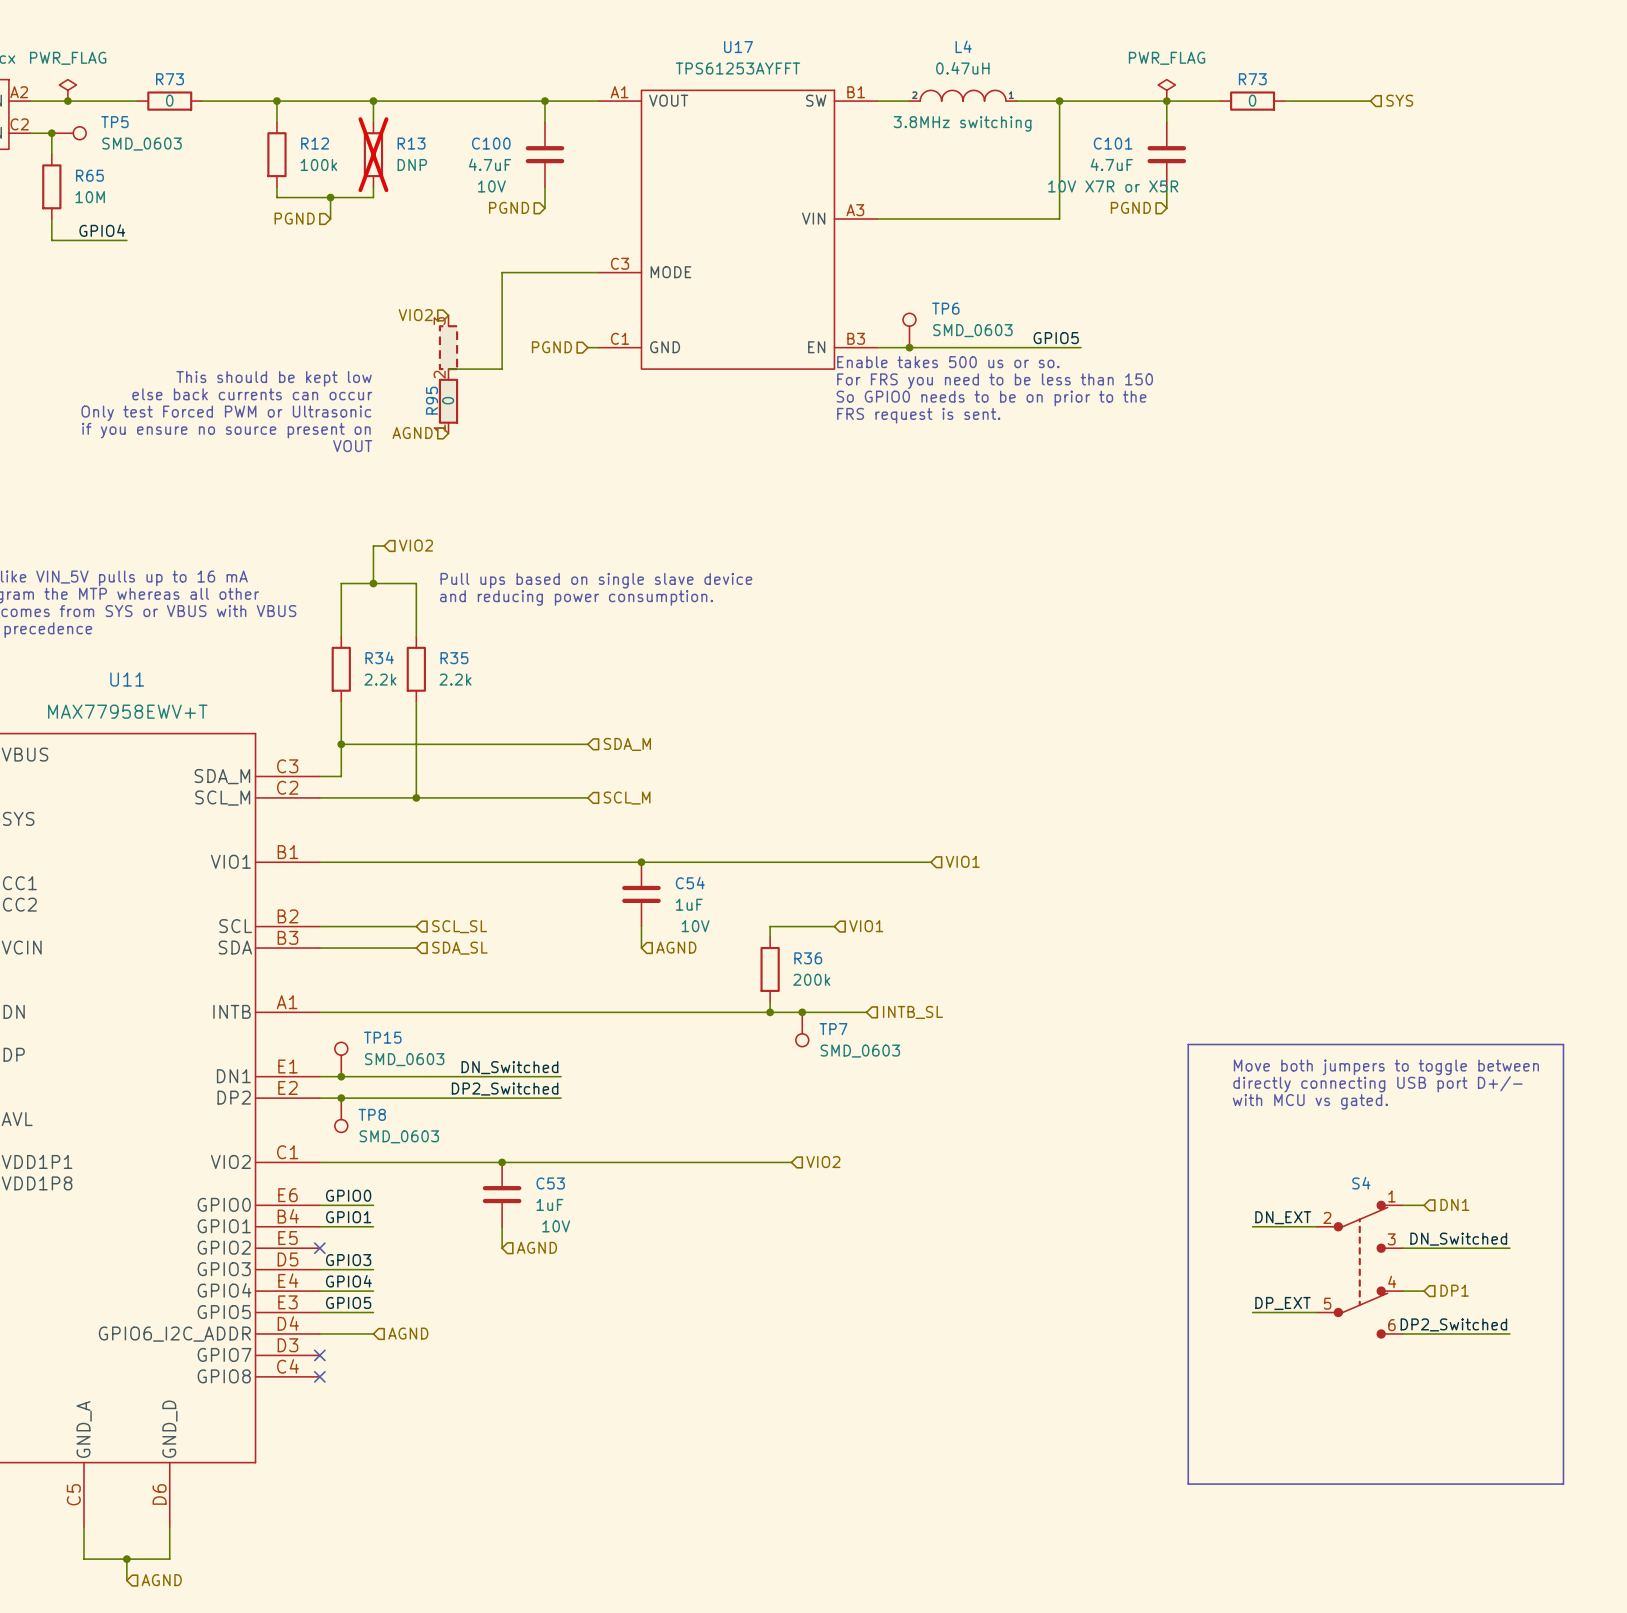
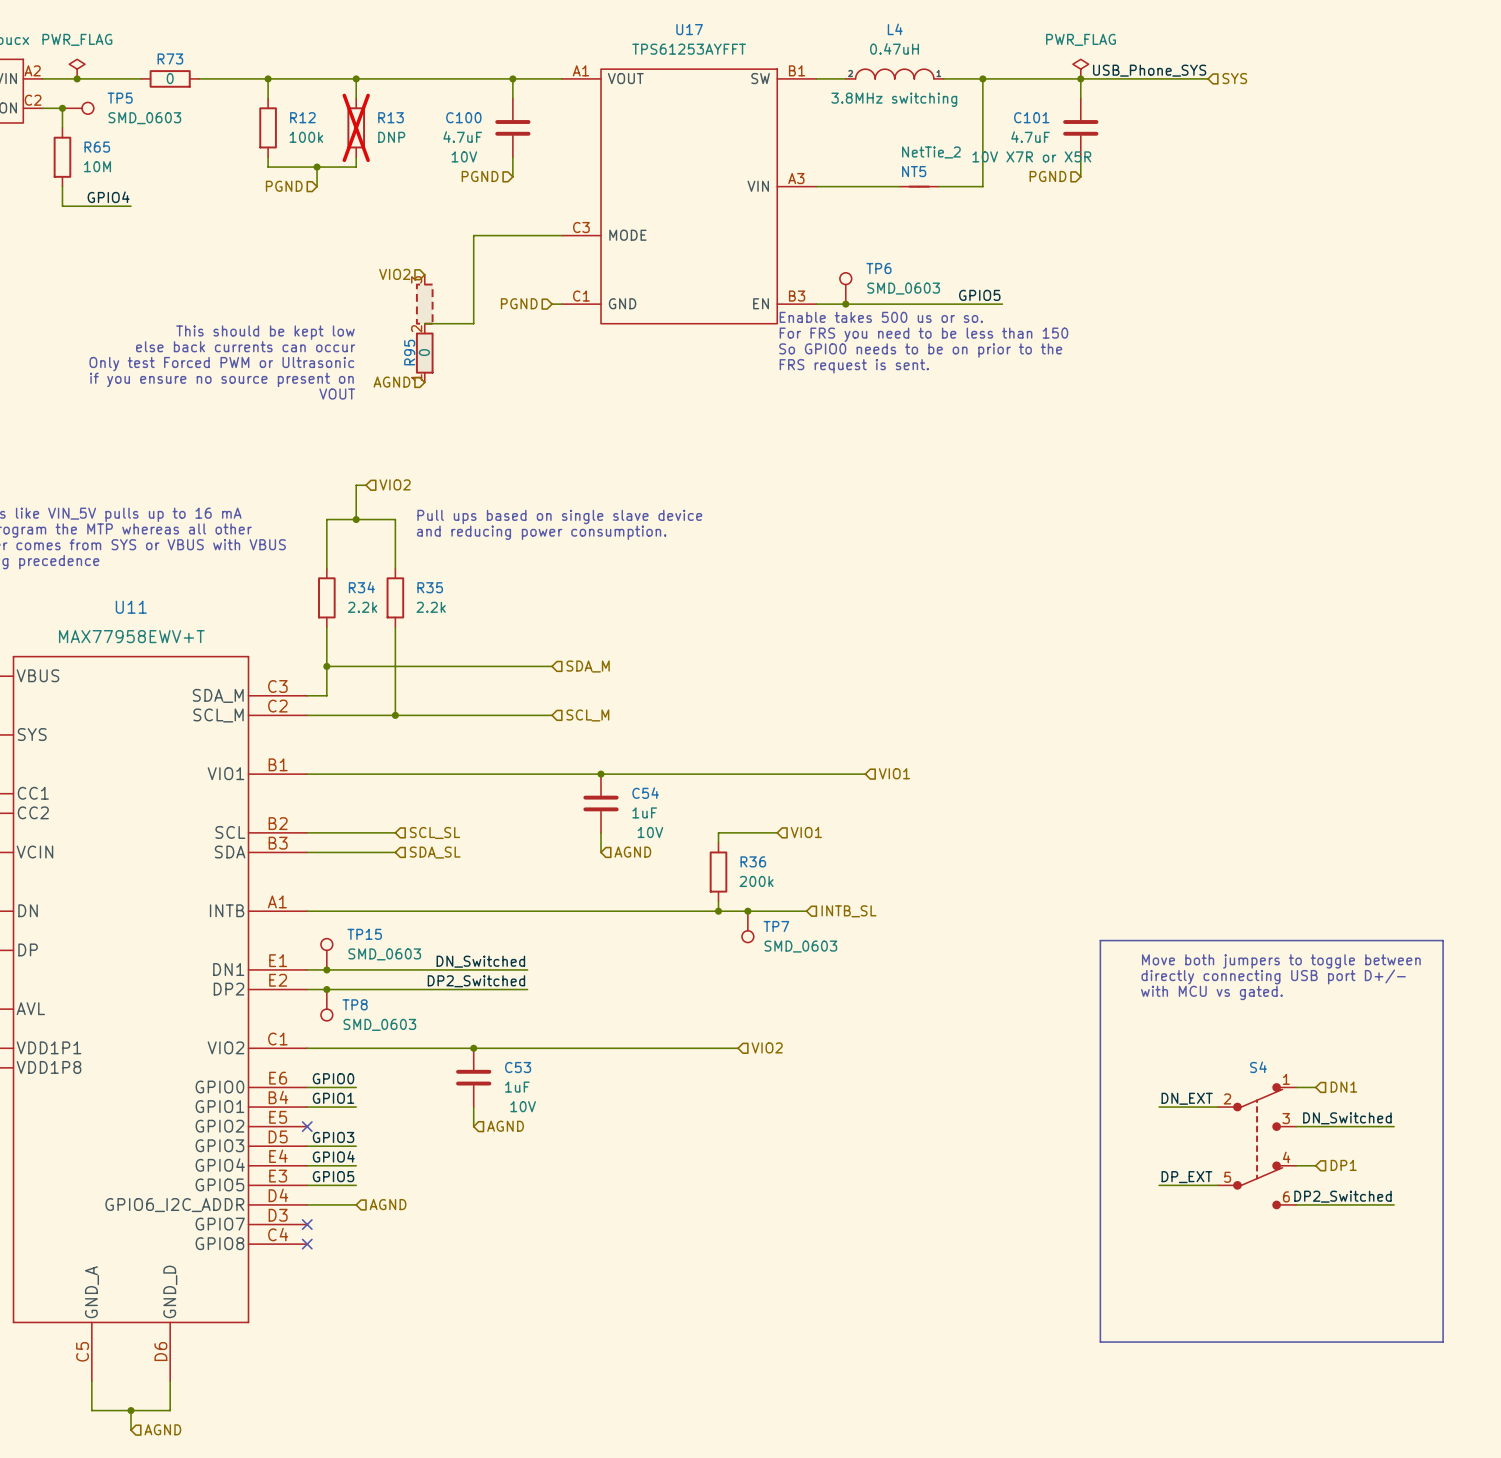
label: none -> USB_Phone_SYS (1149, 70)
hierarchical label position: SYS (1399, 100) -> SYS (1234, 78)
R73: 0 (1252, 101) -> none
wire: (1306, 101) (1370, 101) -> (1129, 78) (1188, 78)
NT5: none -> NetTie_2 (919, 186)

